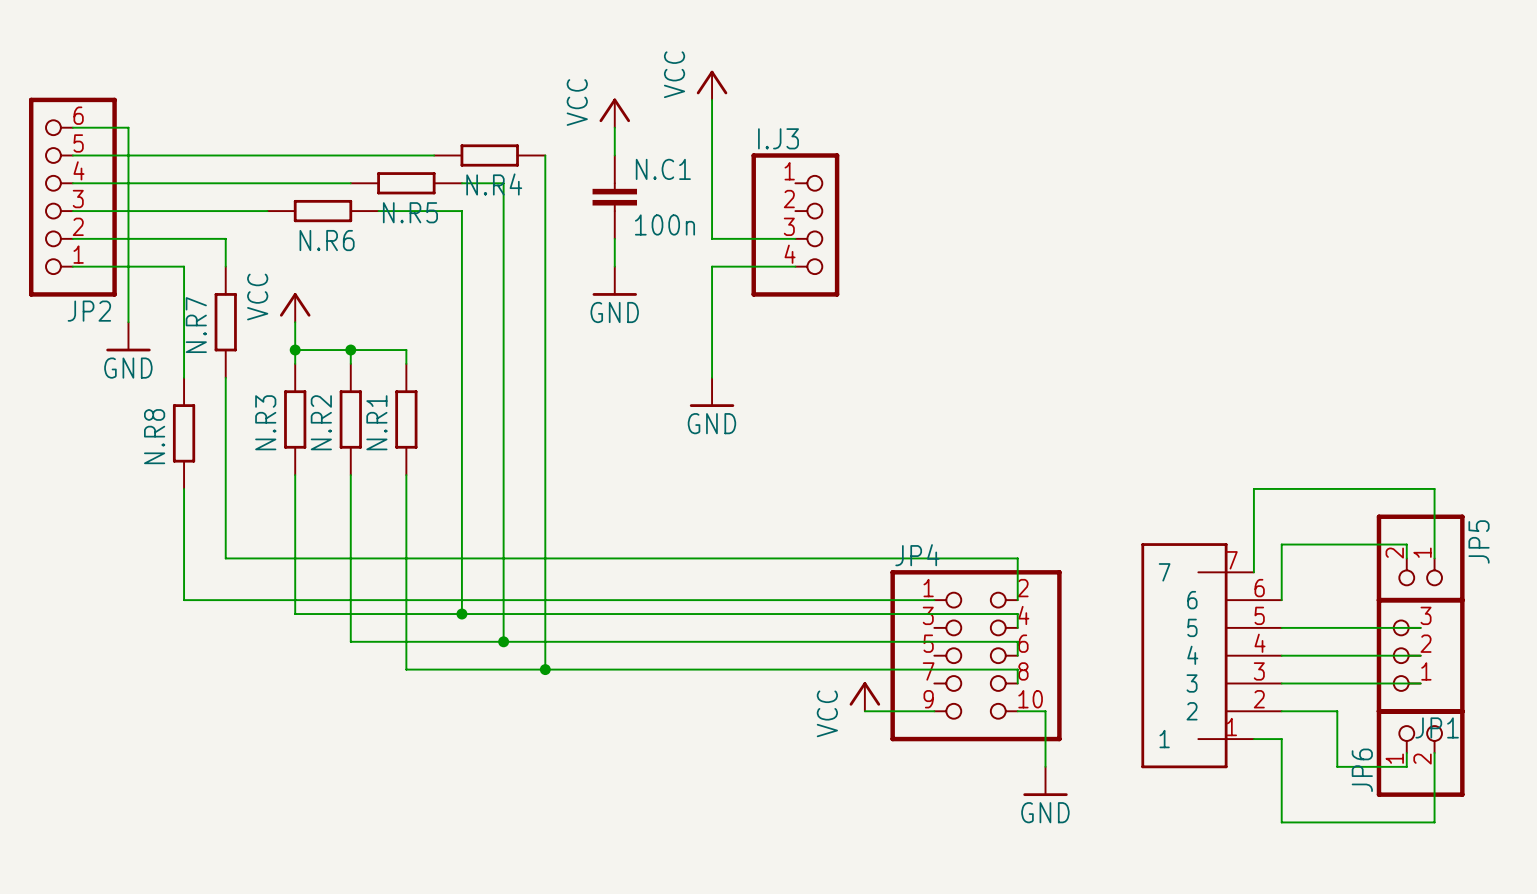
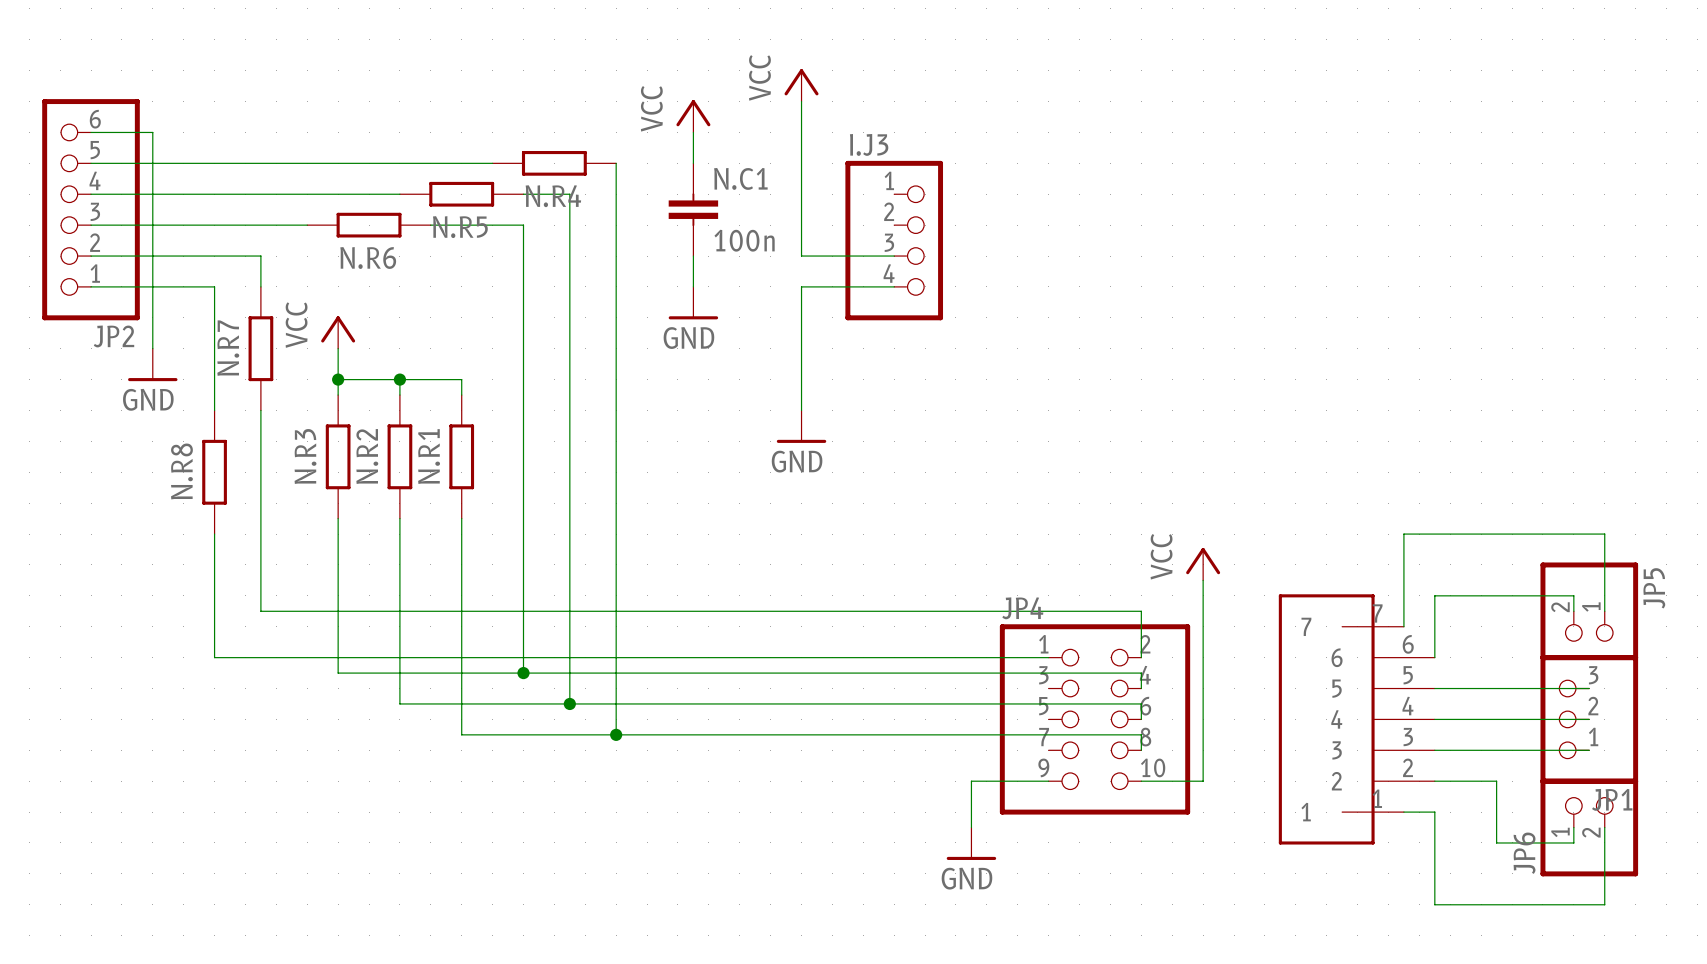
power symbol: none -> VCC (1203, 564)
power symbol: VCC (864, 696) -> none
wire: none -> (971, 781) (971, 827)
wire: (1045, 711) (1045, 766) -> (1172, 781) (1203, 781) (1203, 580)
power symbol position: GND (1045, 781) -> GND (971, 843)

